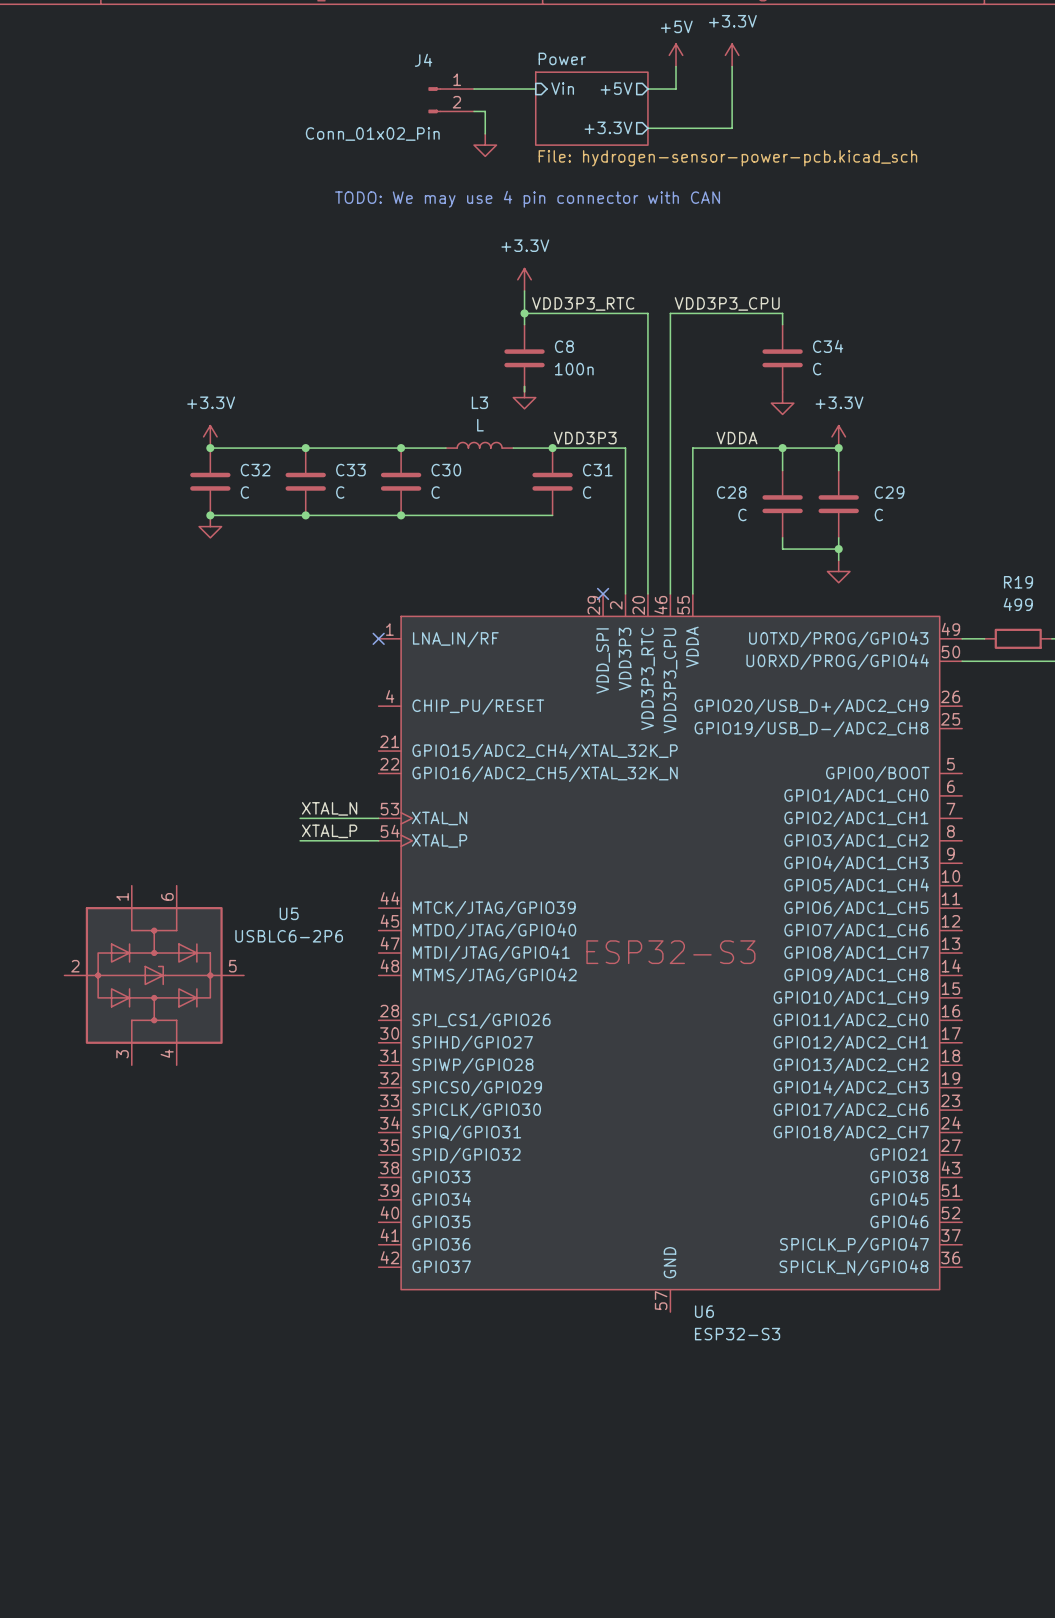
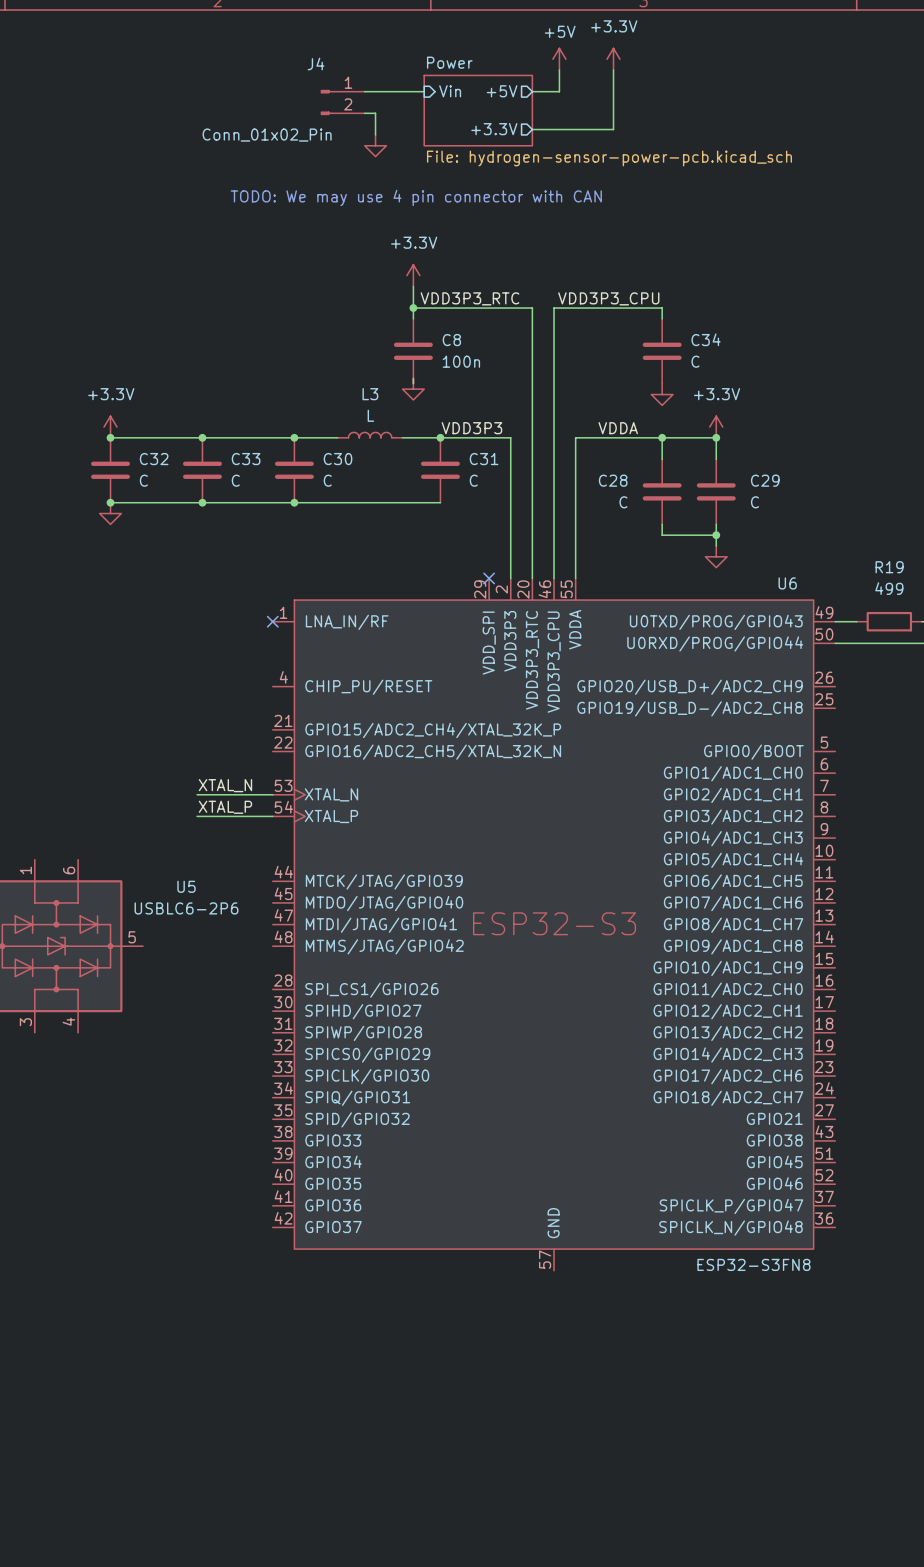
U6 name position: U6 (704, 1311) -> U6 (787, 583)
U6 value: ESP32-S3 (737, 1334) -> ESP32-S3FN8 (753, 1264)

